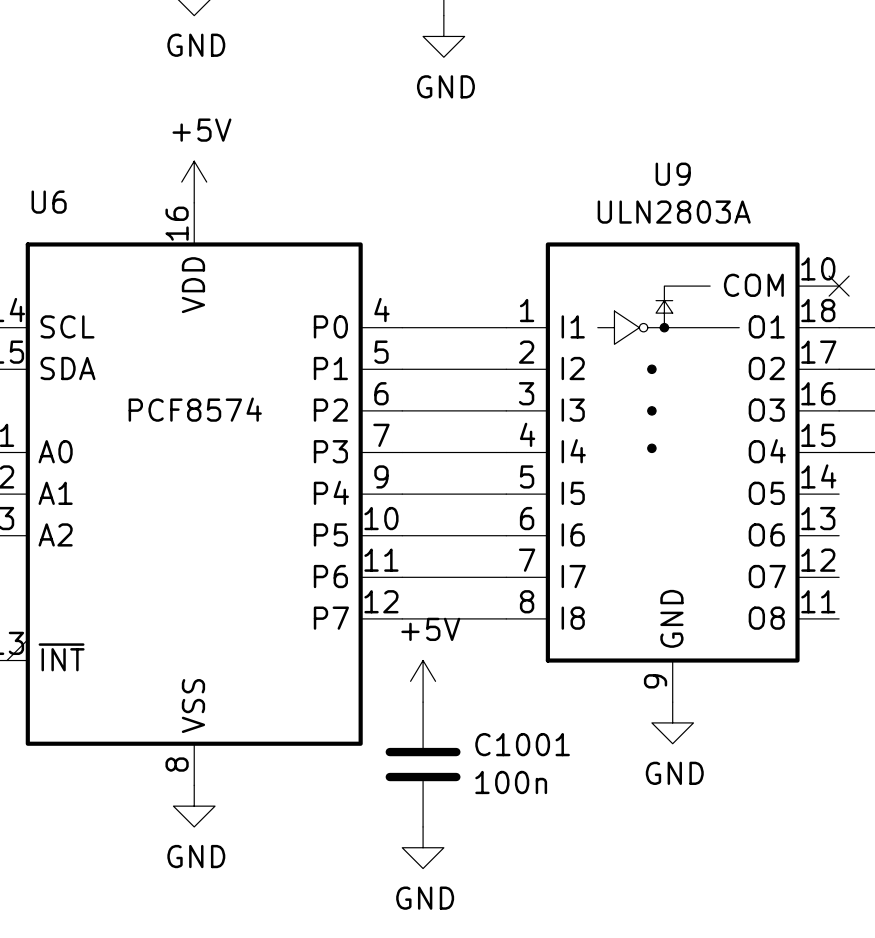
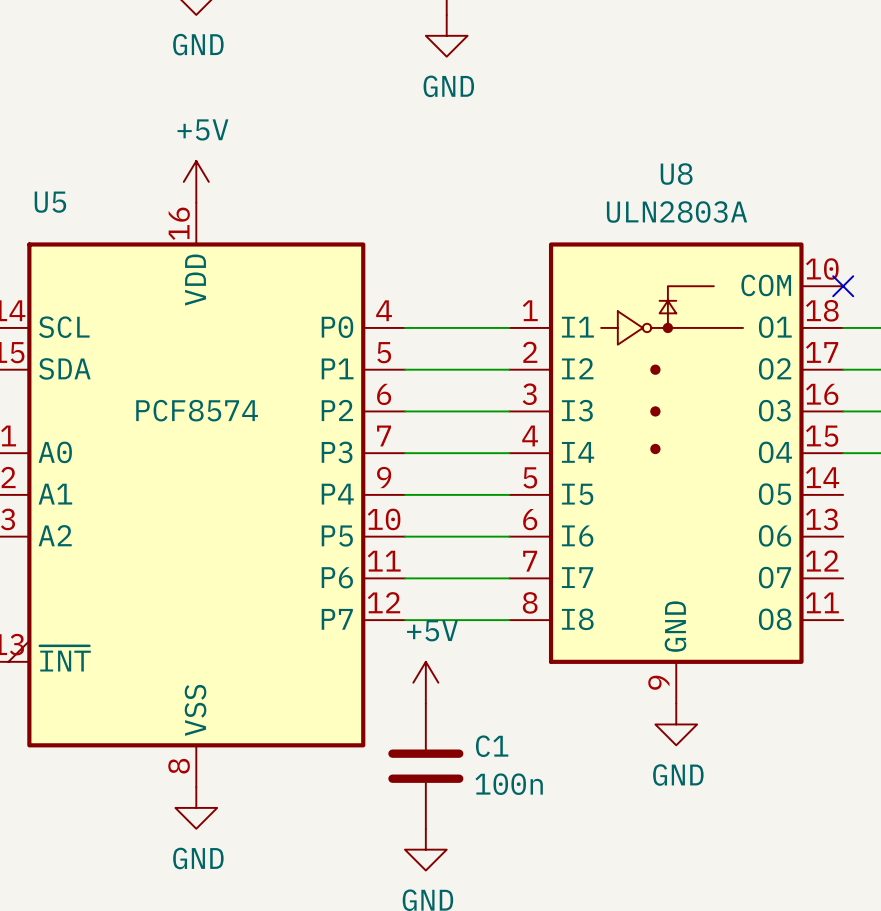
U9 name: U9 (673, 174) -> U8 (676, 174)
U6 name: U6 (49, 202) -> U5 (50, 202)
C1001 name: C1001 (522, 744) -> C1 (492, 746)

